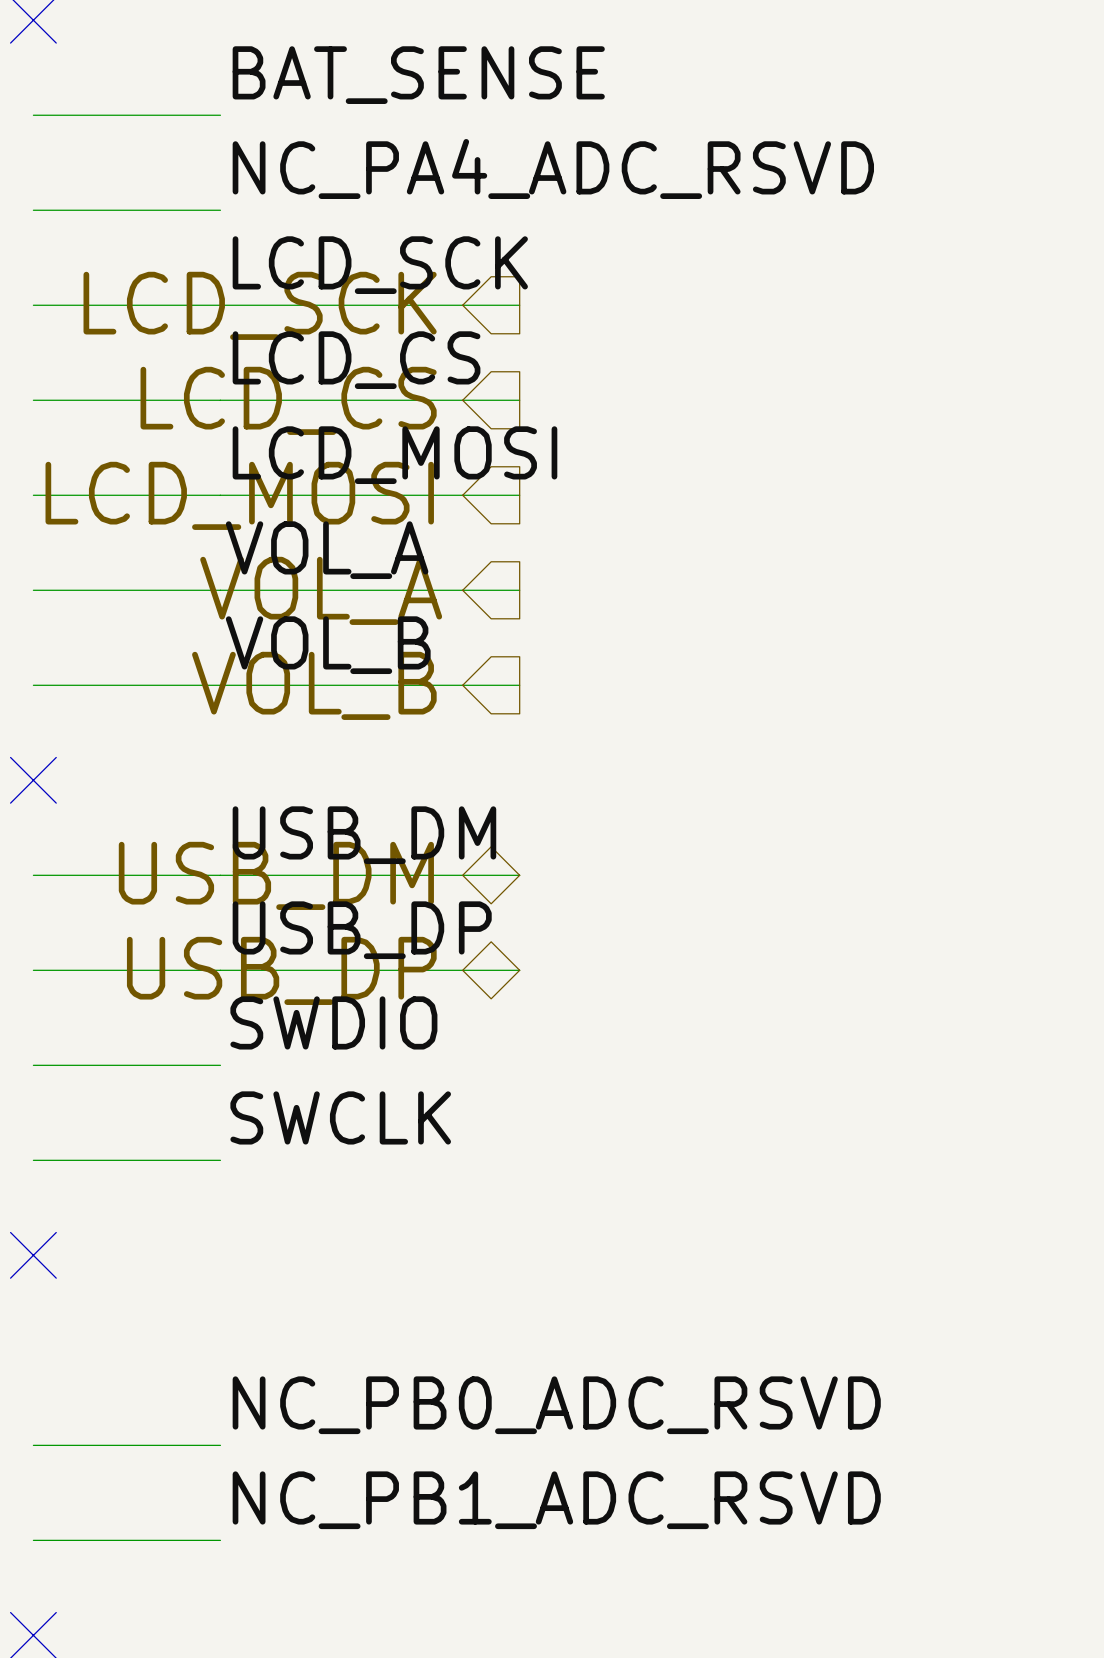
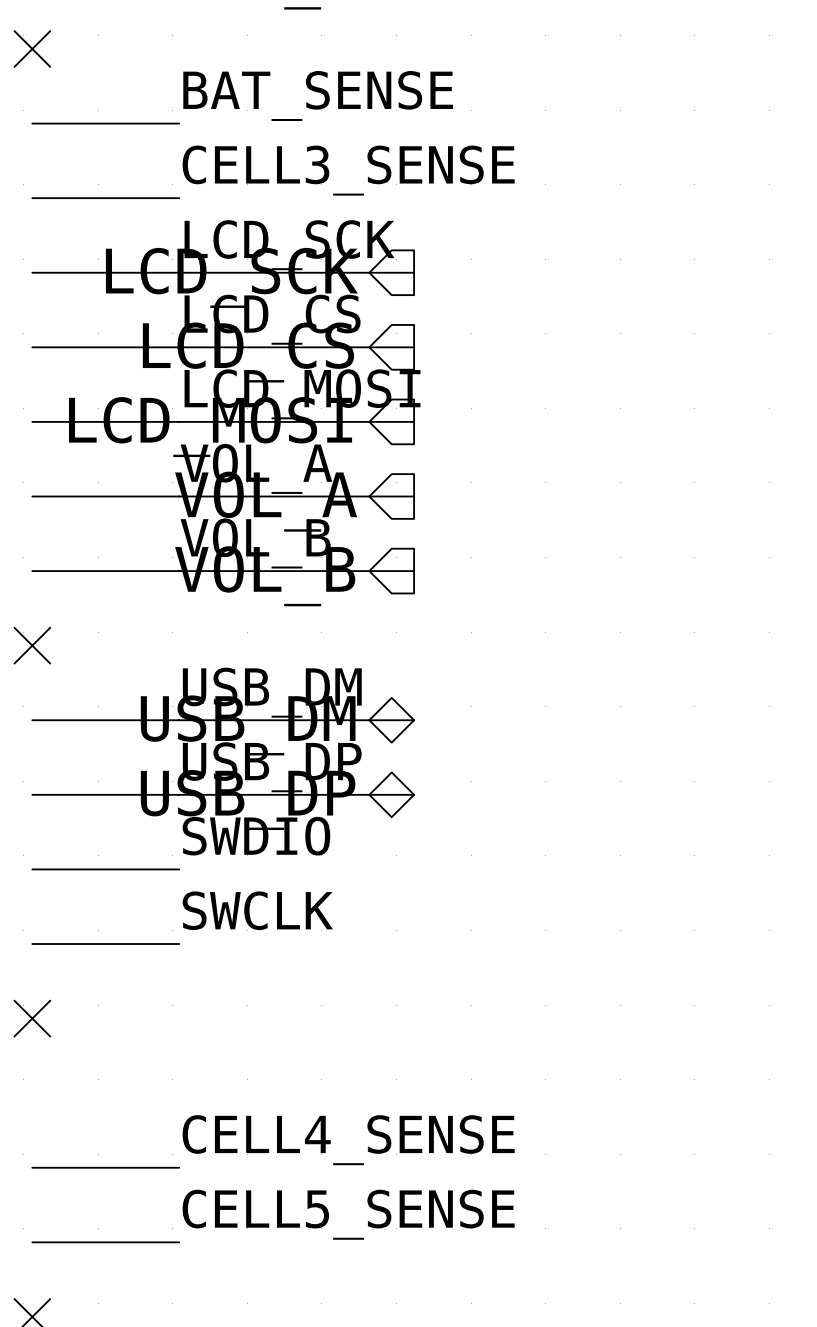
label: NC_PA4_ADC_RSVD (553, 168) -> CELL3_SENSE (348, 170)
label: NC_PB0_ADC_RSVD (556, 1405) -> CELL4_SENSE (348, 1140)
label: NC_PB1_ADC_RSVD (556, 1500) -> CELL5_SENSE (348, 1214)

